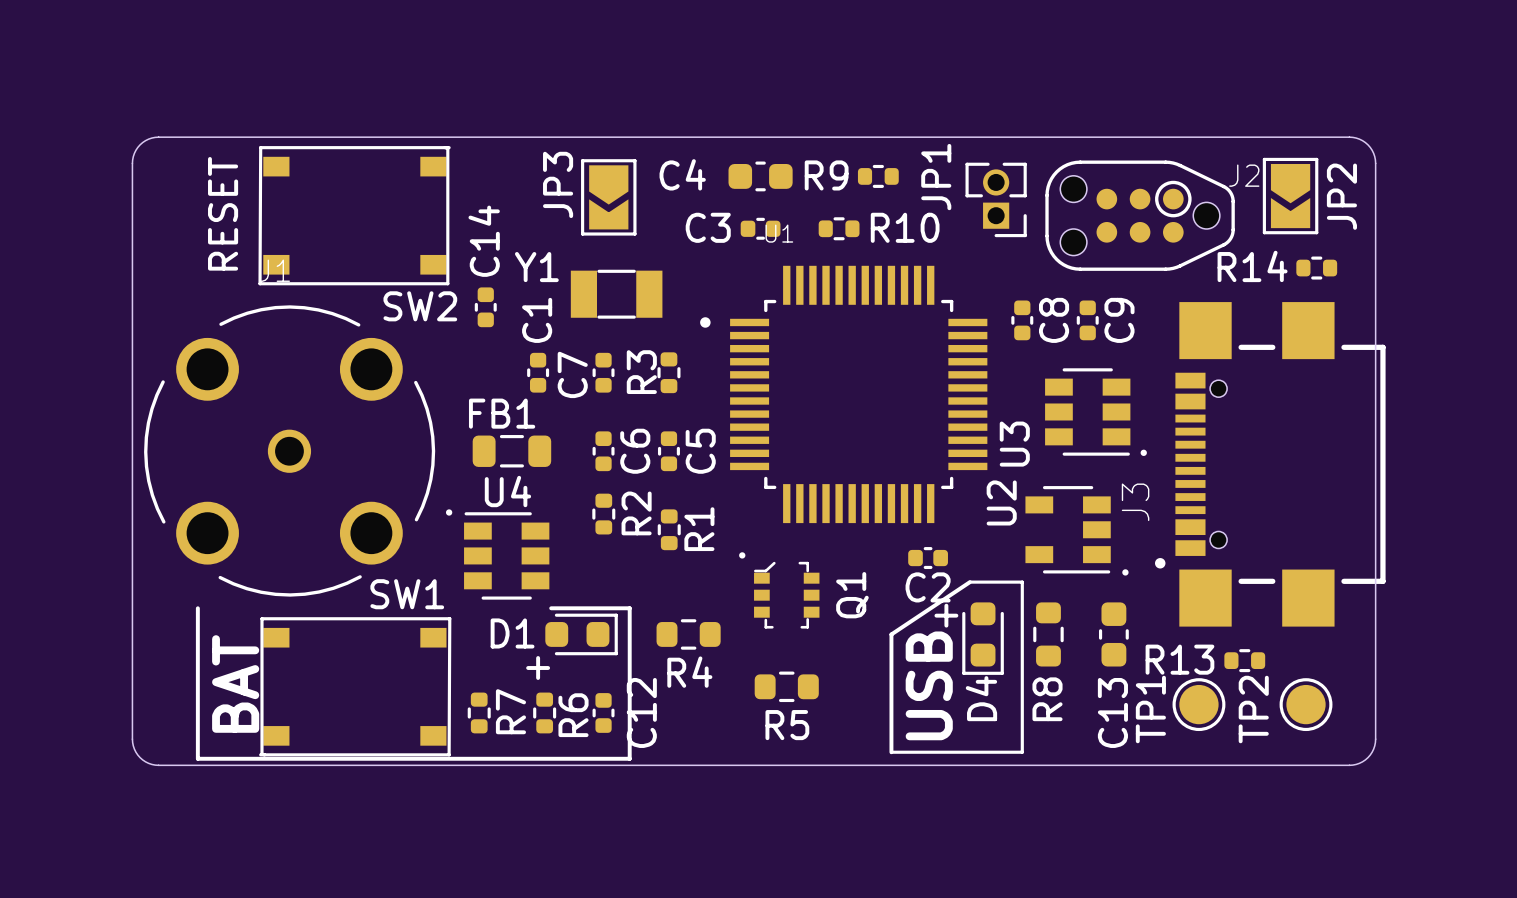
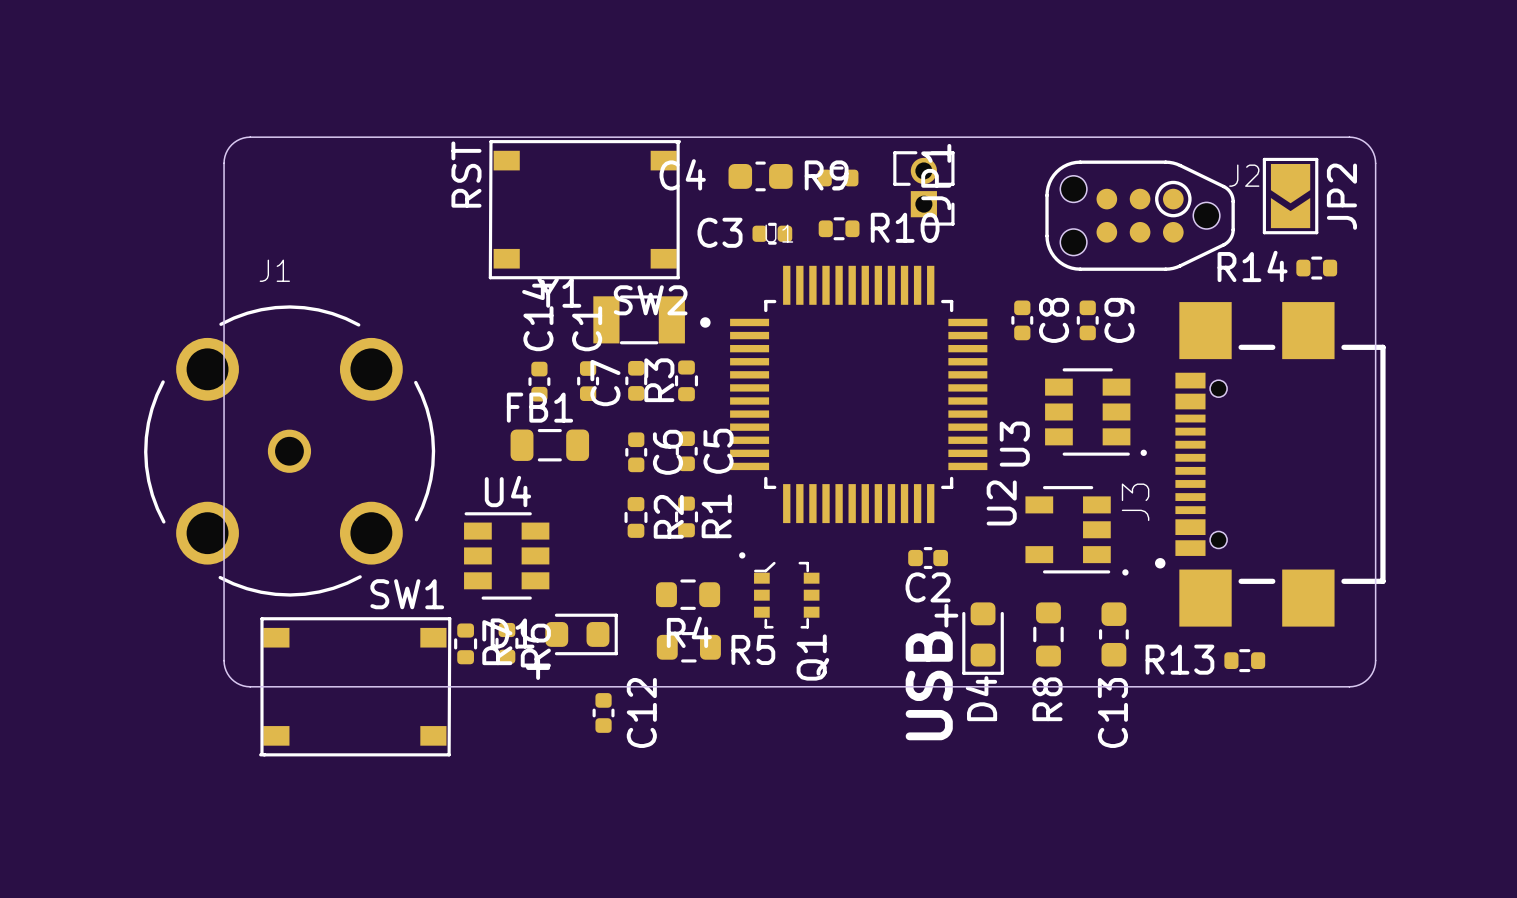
board edge: (250, 137) (155, 137) (140, 144) (132, 159) (132, 739) (137, 755) (148, 763) (158, 765) (1352, 765) (1367, 757) (1374, 745) (1375, 660) -> (250, 137) (240, 139) (231, 144) (226, 153) (224, 163) (224, 660) (229, 676) (240, 684) (250, 686) (1349, 686) (1359, 684) (1367, 679) (1373, 670) (1375, 660)
text: none -> RST (466, 174)
R9 position: (878, 176) -> (838, 178)
JP3: (608, 197) -> none
JP1 position: (996, 199) -> (923, 188)
text: RESET (223, 213) -> none
SW2 position: (354, 215) -> (584, 209)
C3 position: (760, 228) -> (772, 233)
Y1 position: (616, 294) -> (639, 319)
C14 position: (485, 307) -> (539, 381)
C1 position: (538, 372) -> (588, 381)
C7 position: (603, 372) -> (636, 380)
R3 position: (668, 372) -> (686, 380)
FB1 position: (511, 451) -> (549, 445)
C6 position: (603, 451) -> (636, 452)
C5 position: (668, 451) -> (686, 451)
drawing: [445, 509, 453, 516] -> none
R2 position: (603, 514) -> (635, 517)
R1 position: (669, 529) -> (686, 516)
line: (969, 582) (1022, 582) (1022, 752) (891, 752) (891, 634) (969, 582) -> none
Q1 name position: Q1 (852, 595) -> Q1 (812, 657)
line: (197, 608) (197, 758) (629, 758) (629, 608) (551, 608) -> none
R4 position: (688, 634) -> (688, 594)
text: BAT (235, 684) -> none
R5 position: (786, 686) -> (688, 647)
TP1: (1198, 704) -> none
TP2: (1306, 704) -> none
R7 position: (479, 712) -> (465, 643)
R6 position: (544, 712) -> (506, 643)
R5 name position: R5 (787, 725) -> R5 (753, 649)

